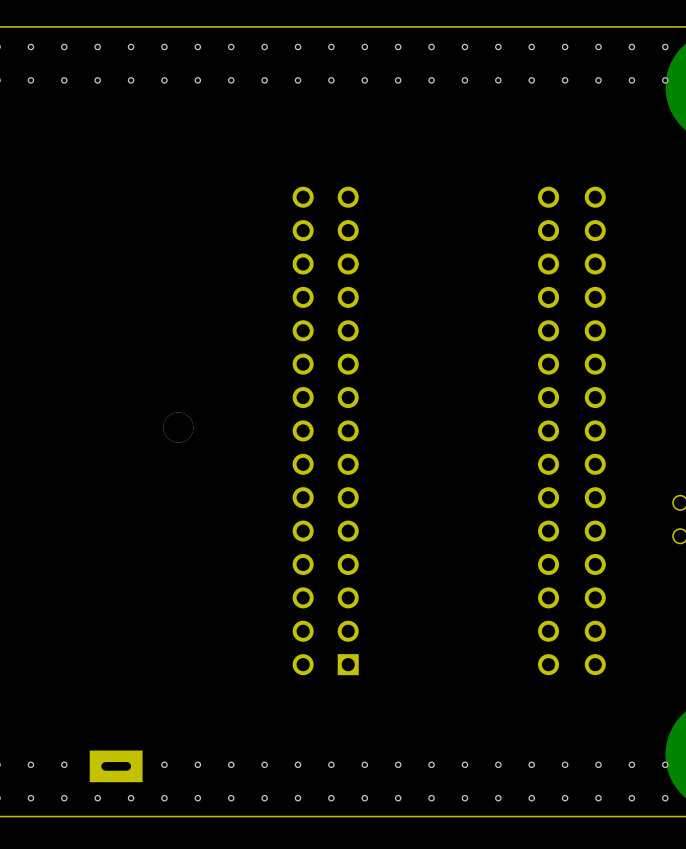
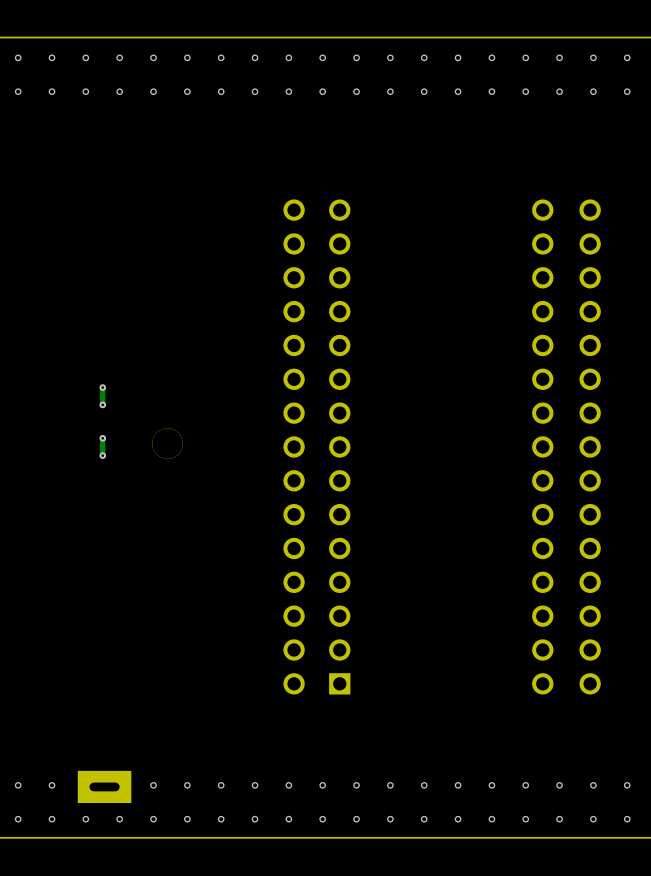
track: none -> (102, 387) (102, 404)
via: none -> (102, 387)
via: none -> (102, 404)
track: none -> (102, 438) (102, 455)
via: none -> (102, 438)
via: none -> (102, 455)

